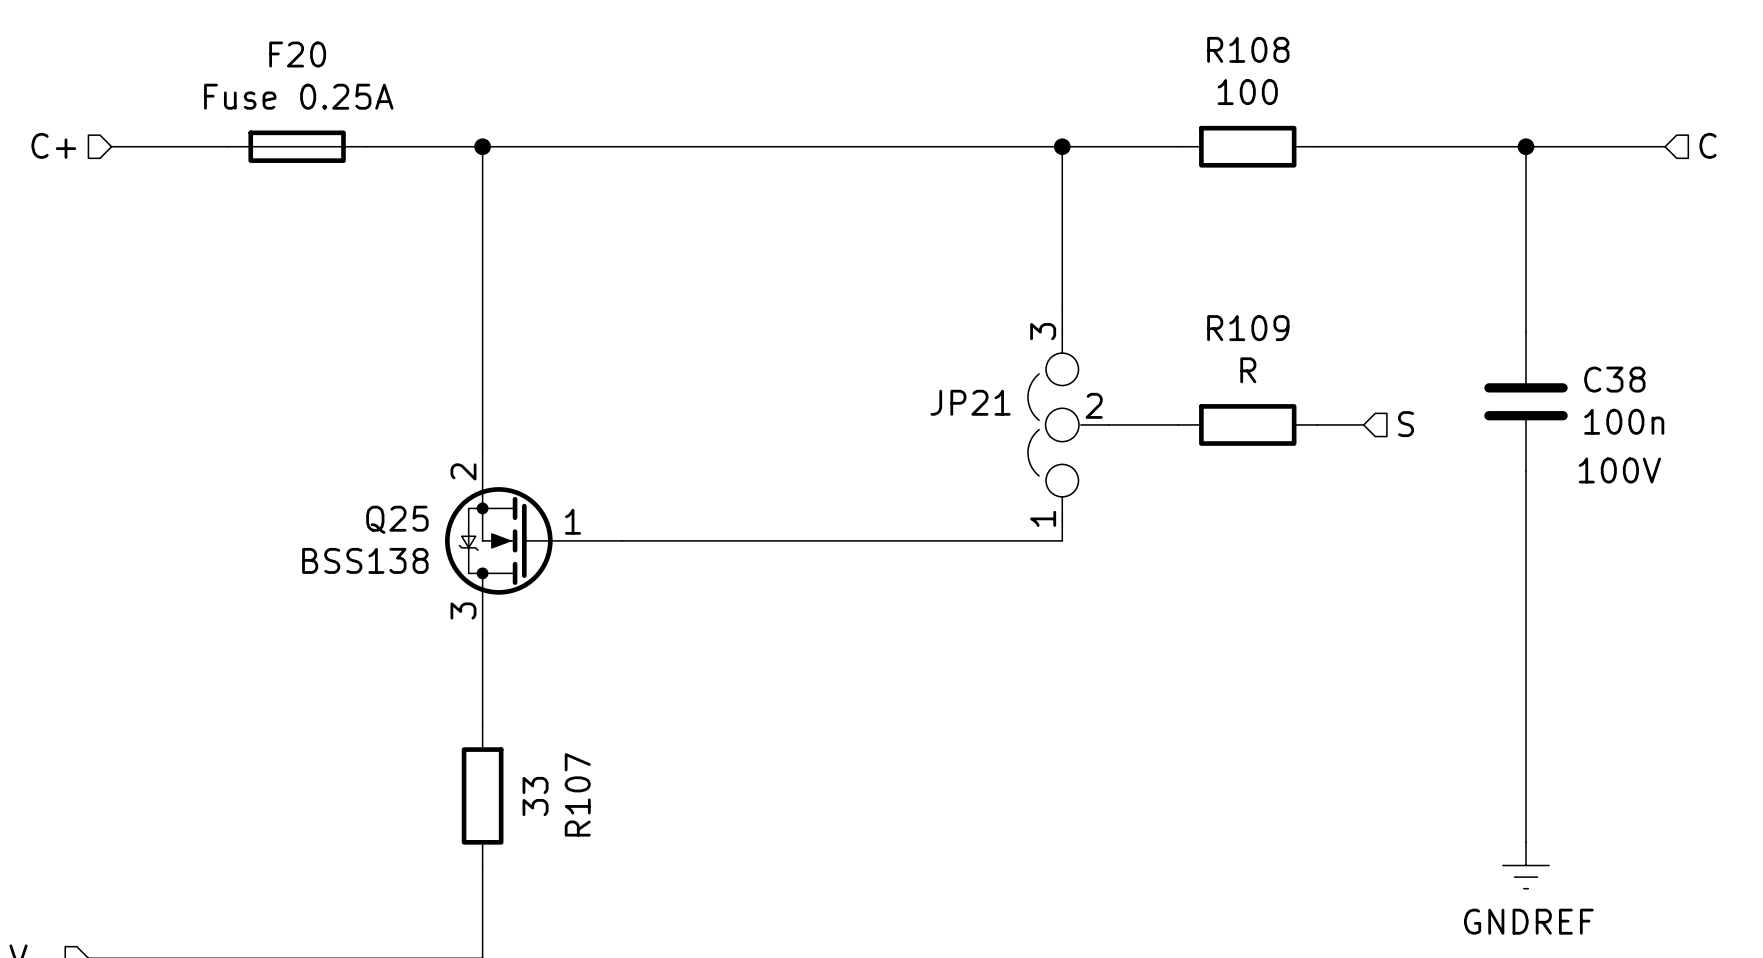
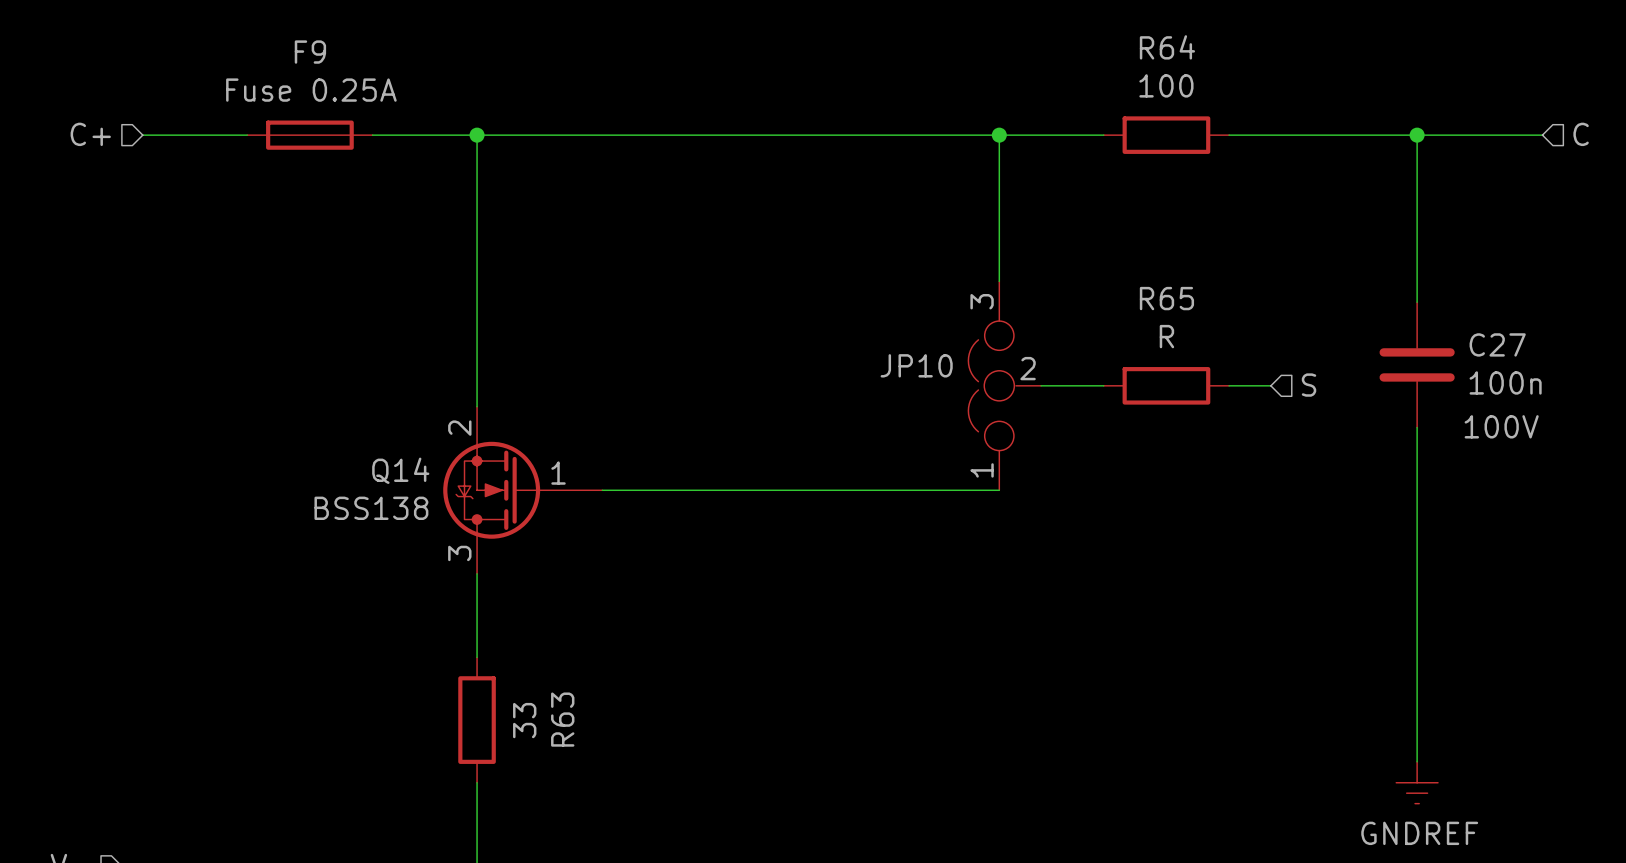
R108 name: R108 (1248, 49) -> R64 (1167, 47)
F20 name: F20 (297, 54) -> F9 (310, 52)
R109 name: R109 (1248, 328) -> R65 (1166, 298)
C38 name: C38 (1614, 379) -> C27 (1497, 344)
JP21 name: JP21 (970, 402) -> JP10 (916, 365)
Q25 name: Q25 (397, 519) -> Q14 (400, 470)
R107 name: R107 (577, 794) -> R63 (562, 719)

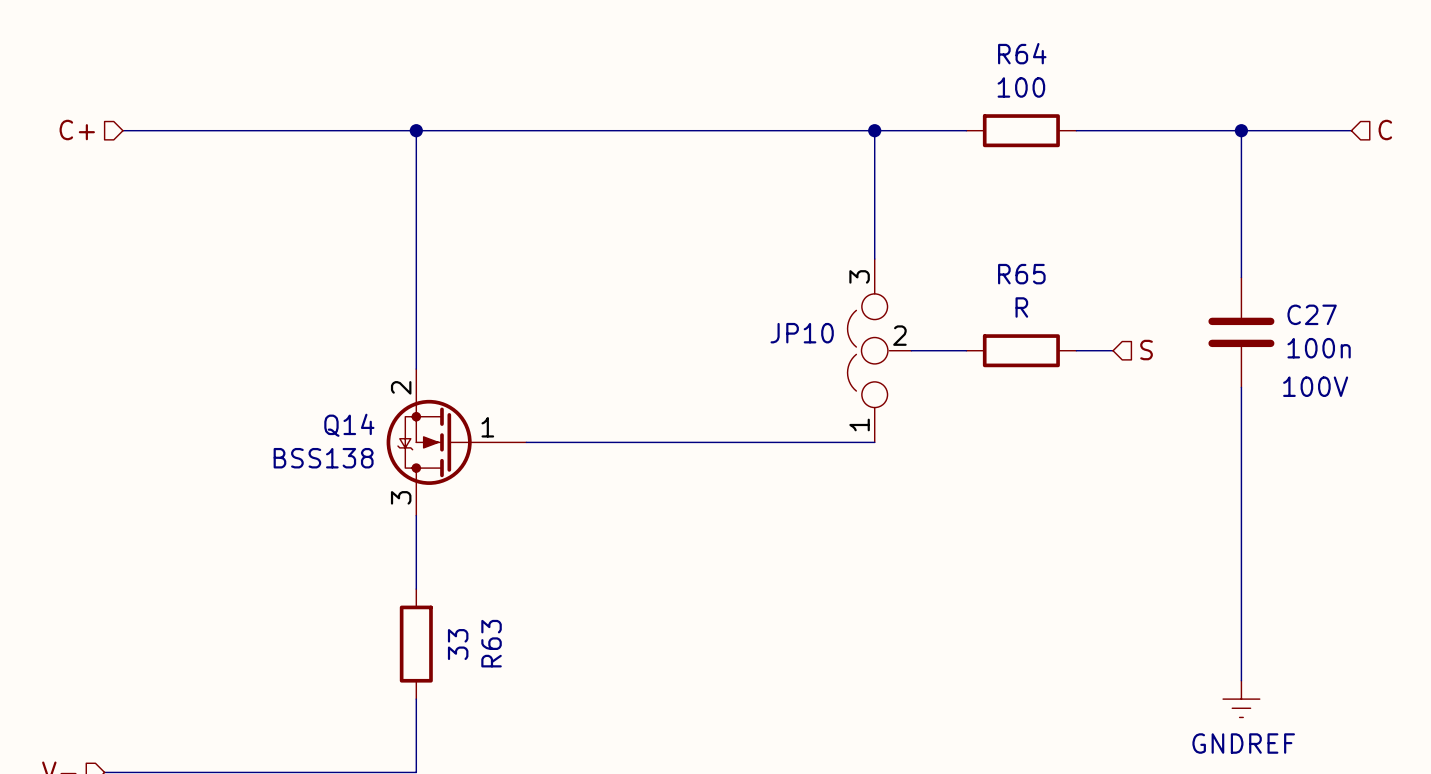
F9: Fuse 0.25A (309, 135) -> none

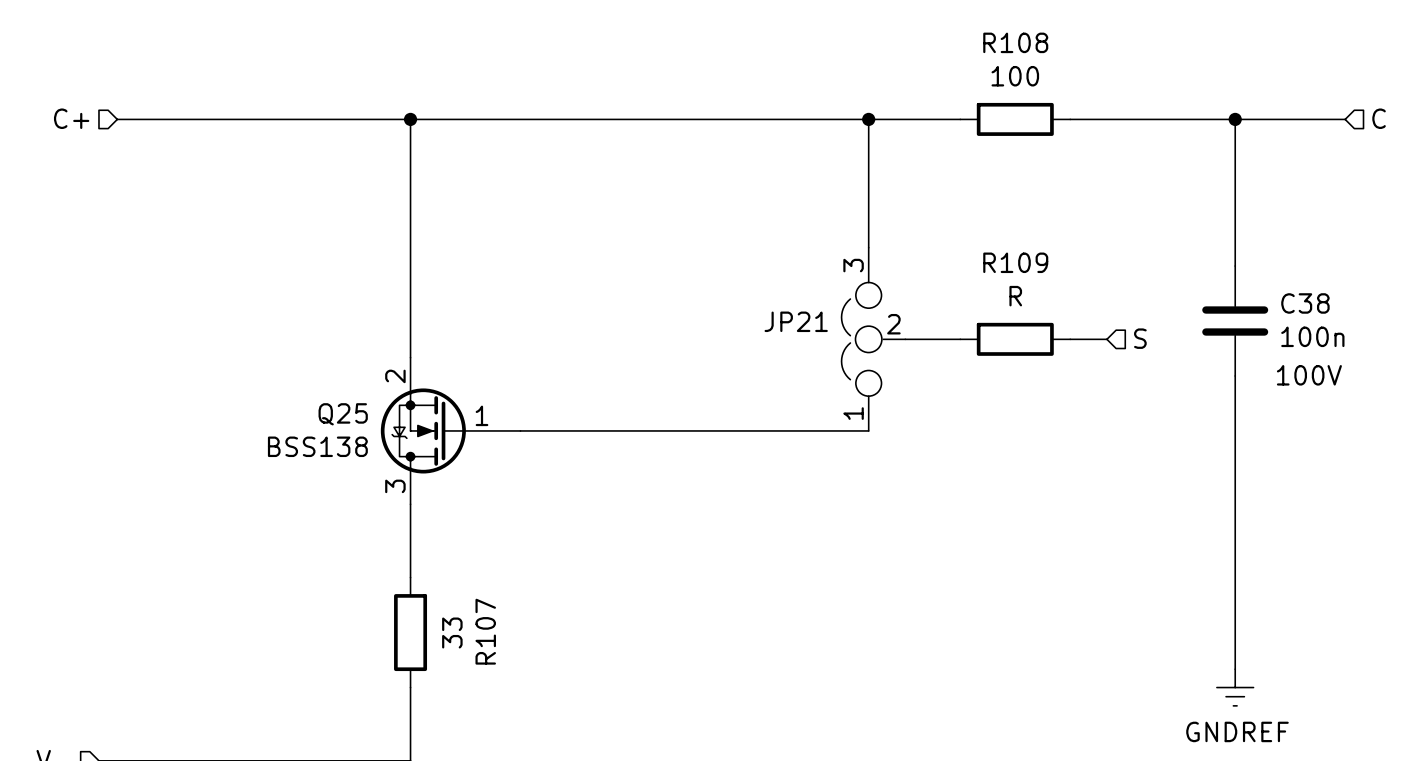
R64 name: R64 (1022, 53) -> R108 (1015, 42)
R65 name: R65 (1021, 274) -> R109 (1015, 262)
C27 name: C27 (1312, 314) -> C38 (1305, 303)
JP10 name: JP10 (802, 333) -> JP21 (796, 321)
Q14 name: Q14 (349, 425) -> Q25 (343, 414)
R63 name: R63 (491, 643) -> R107 (485, 631)

